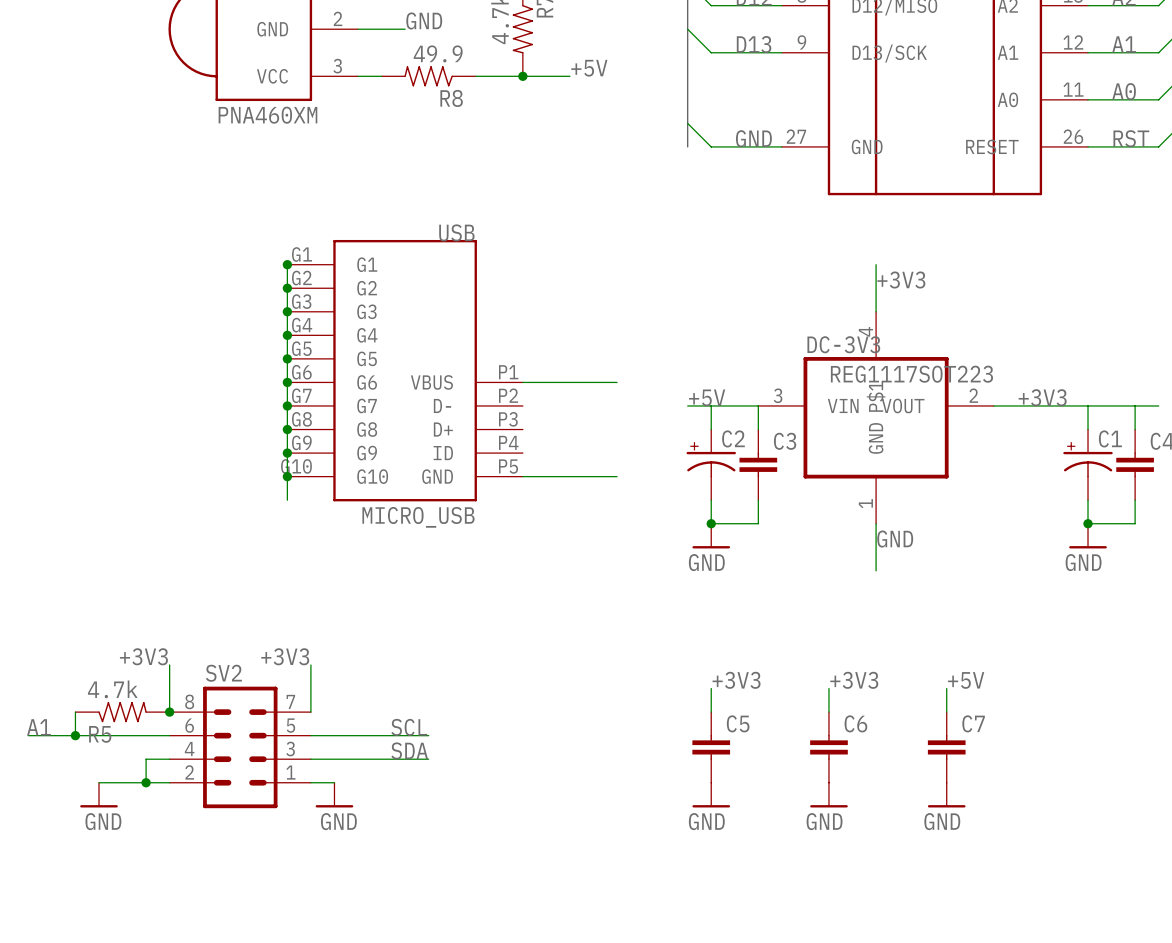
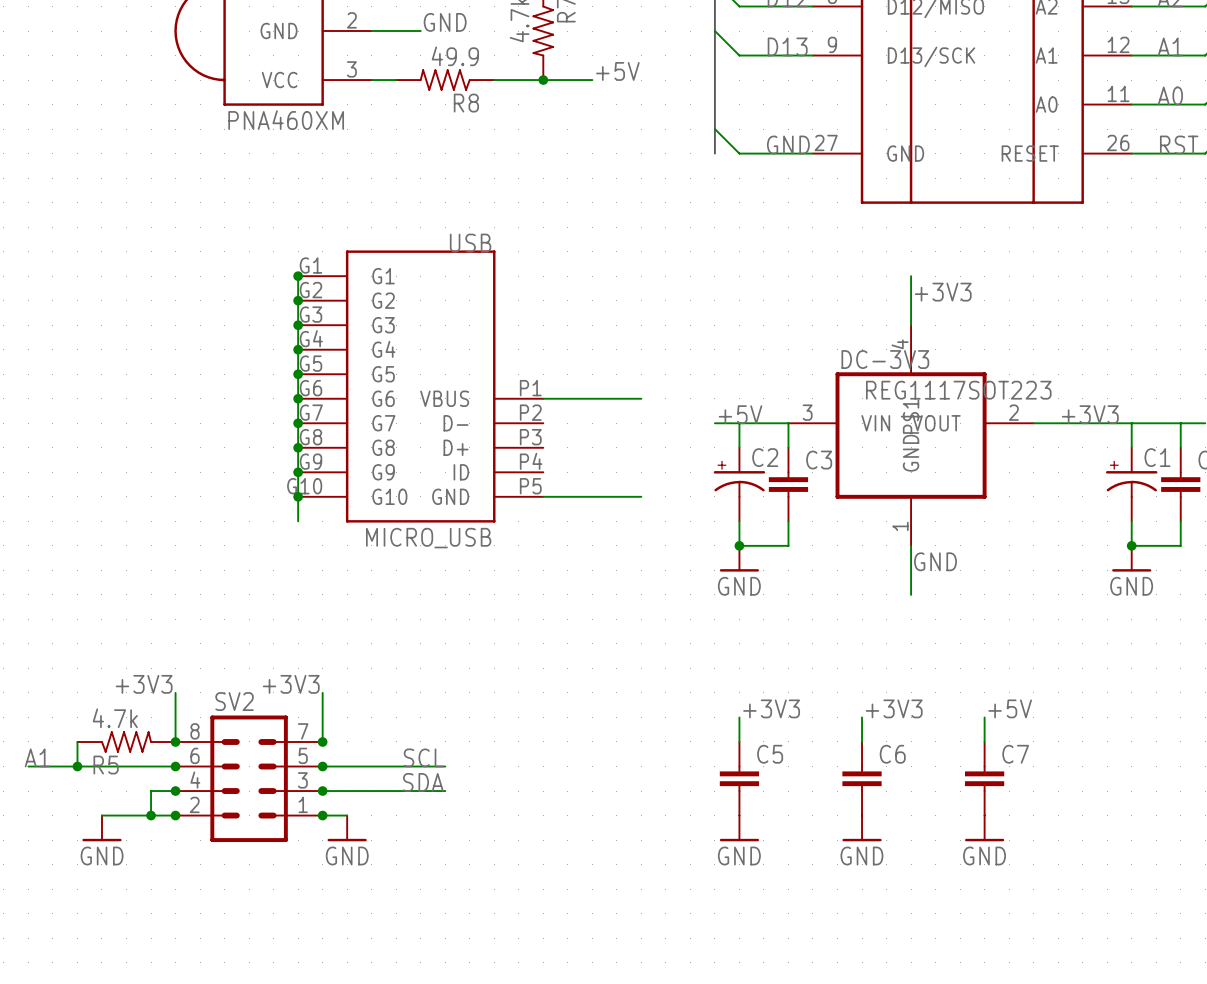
junction: none -> (322, 741)
junction: none -> (175, 766)
junction: none -> (322, 766)
junction: none -> (175, 791)
junction: none -> (322, 791)
junction: none -> (175, 815)
junction: none -> (322, 815)

